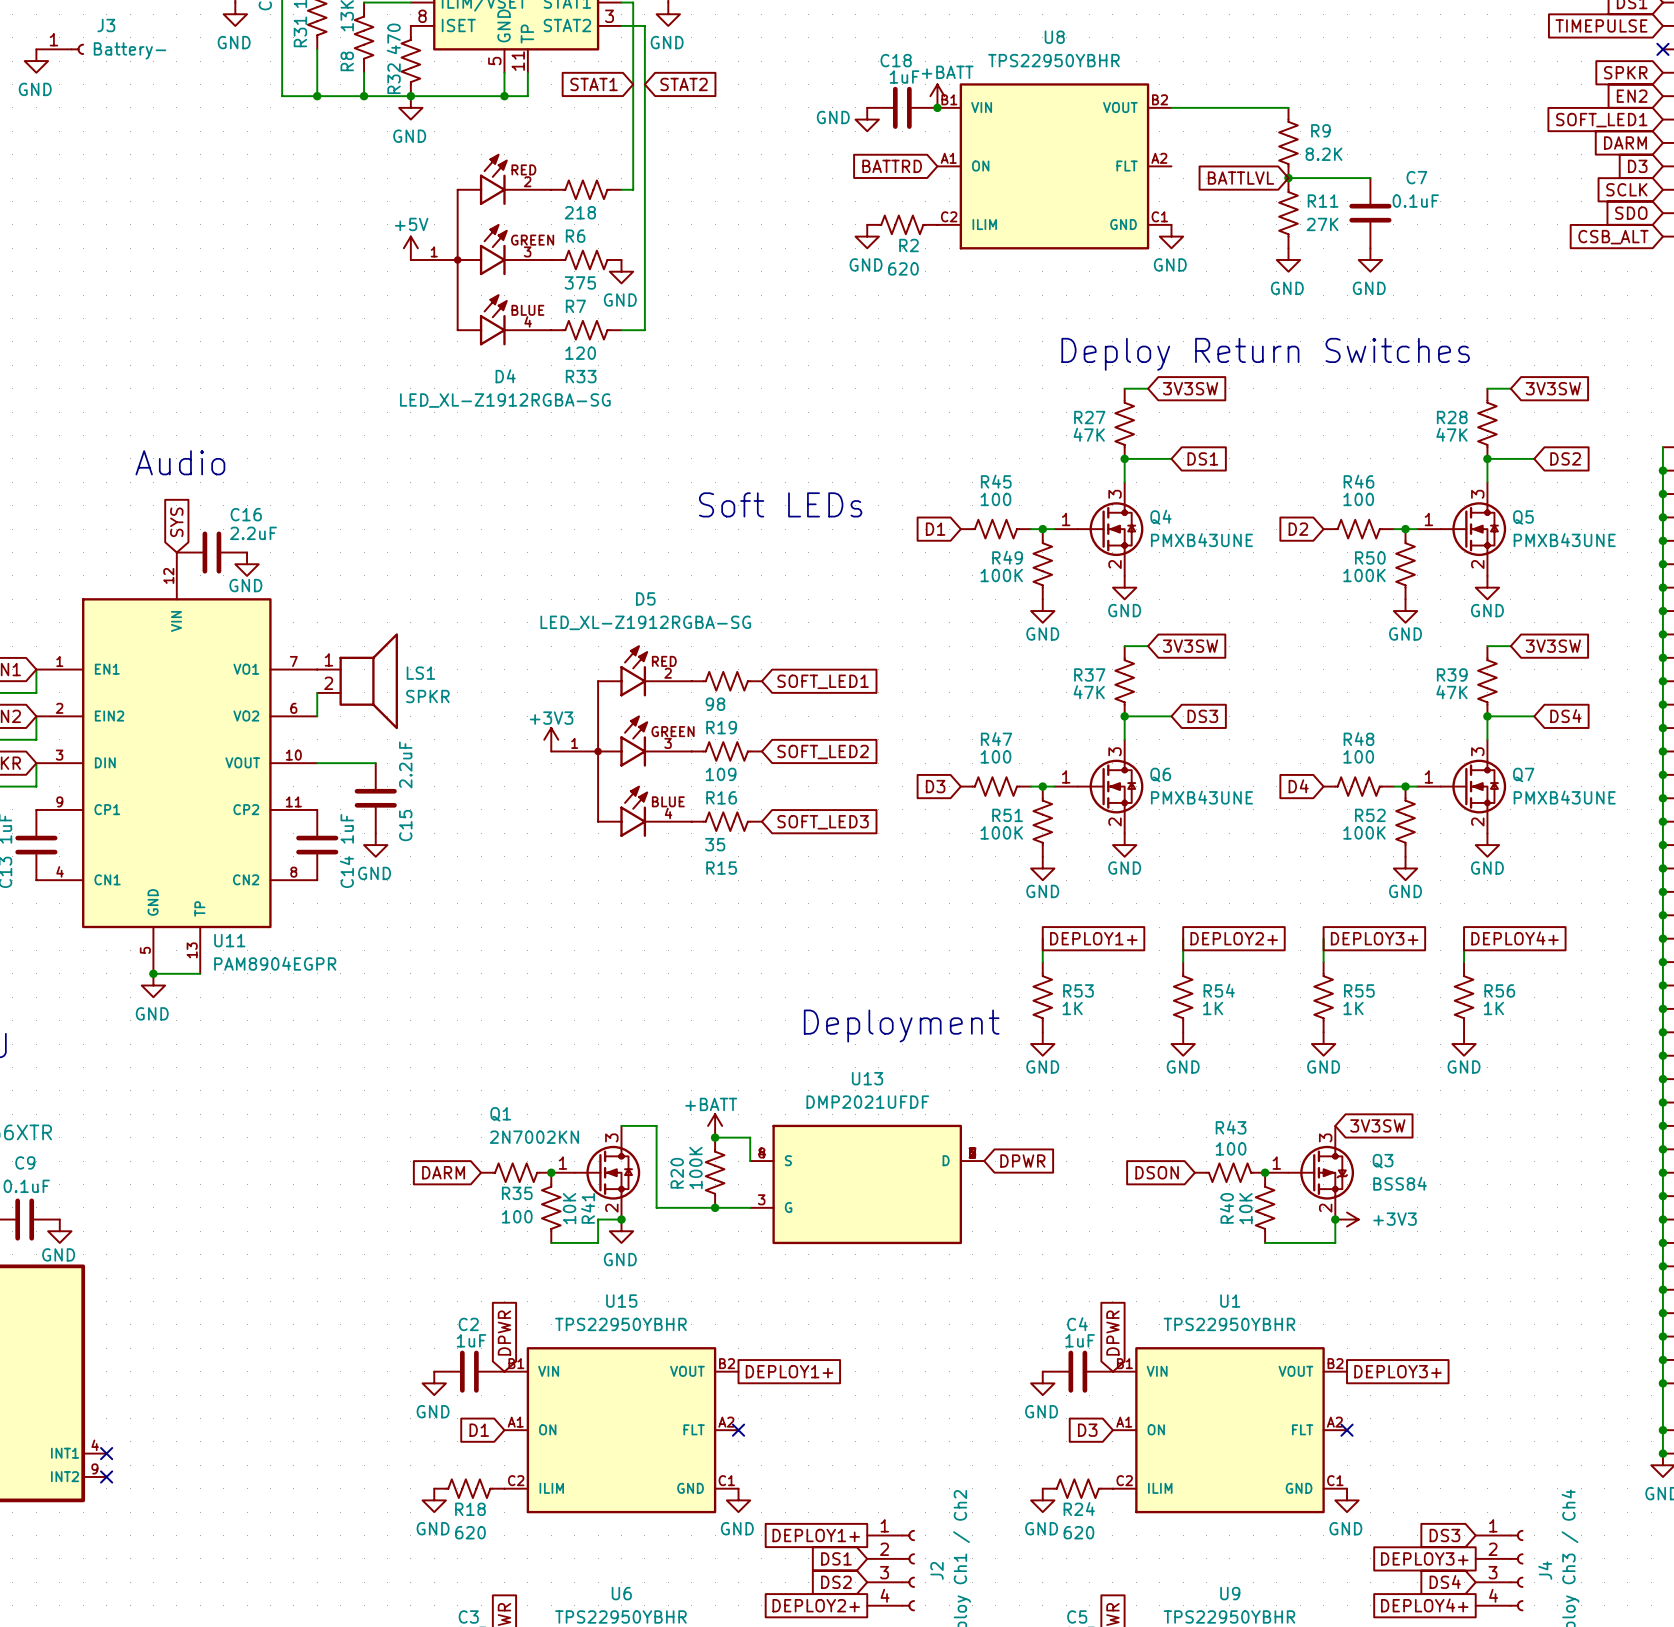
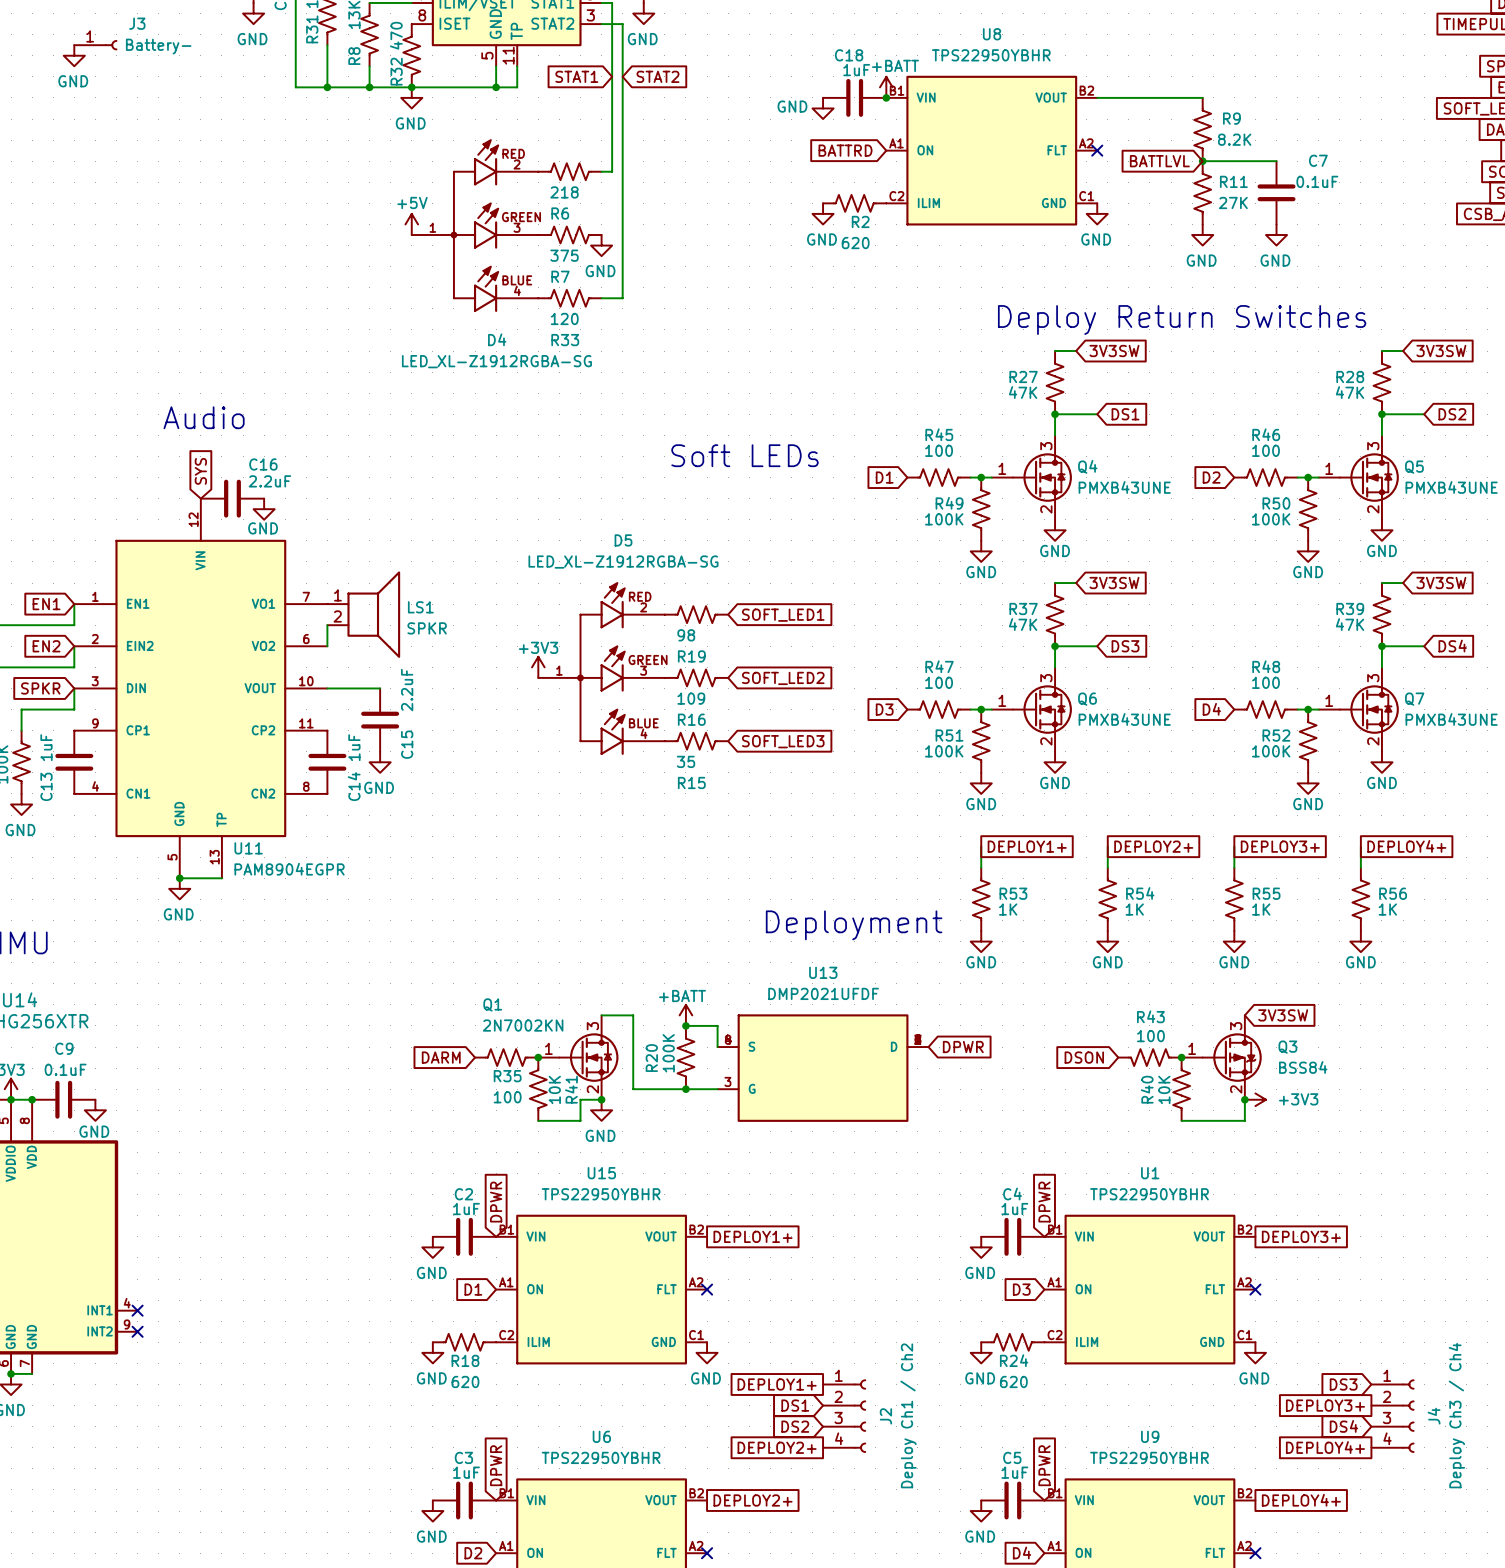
no-connect mark: none -> (1097, 150)

